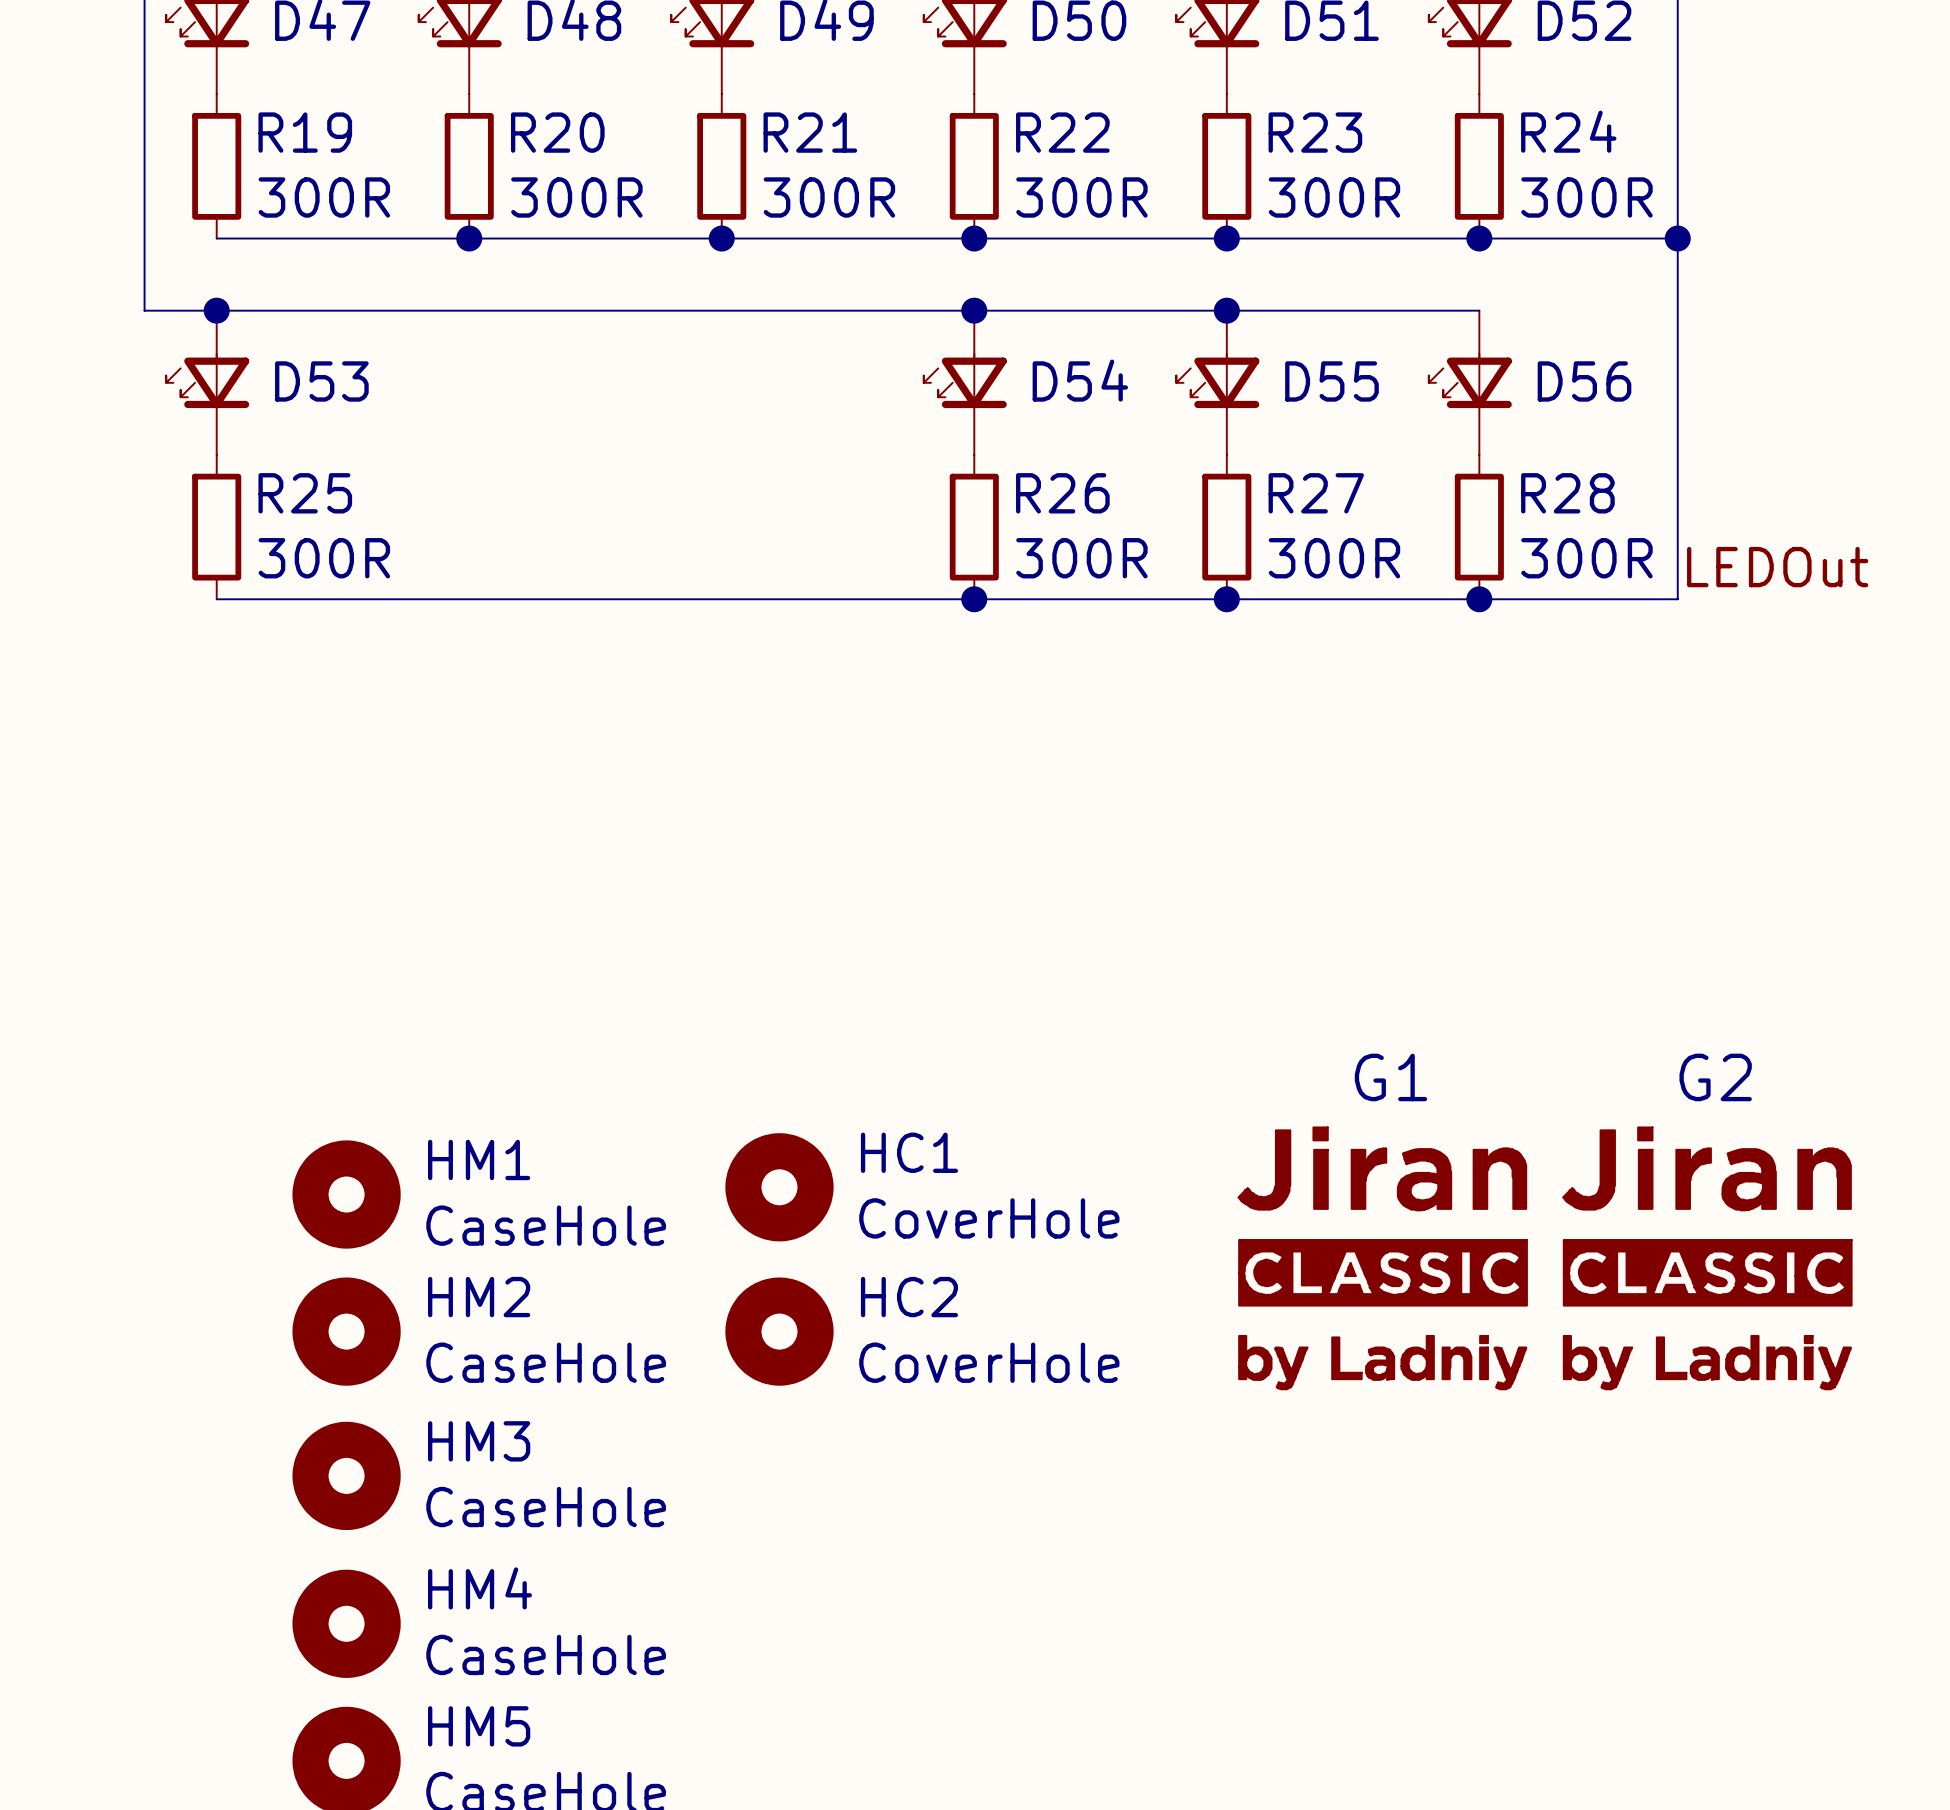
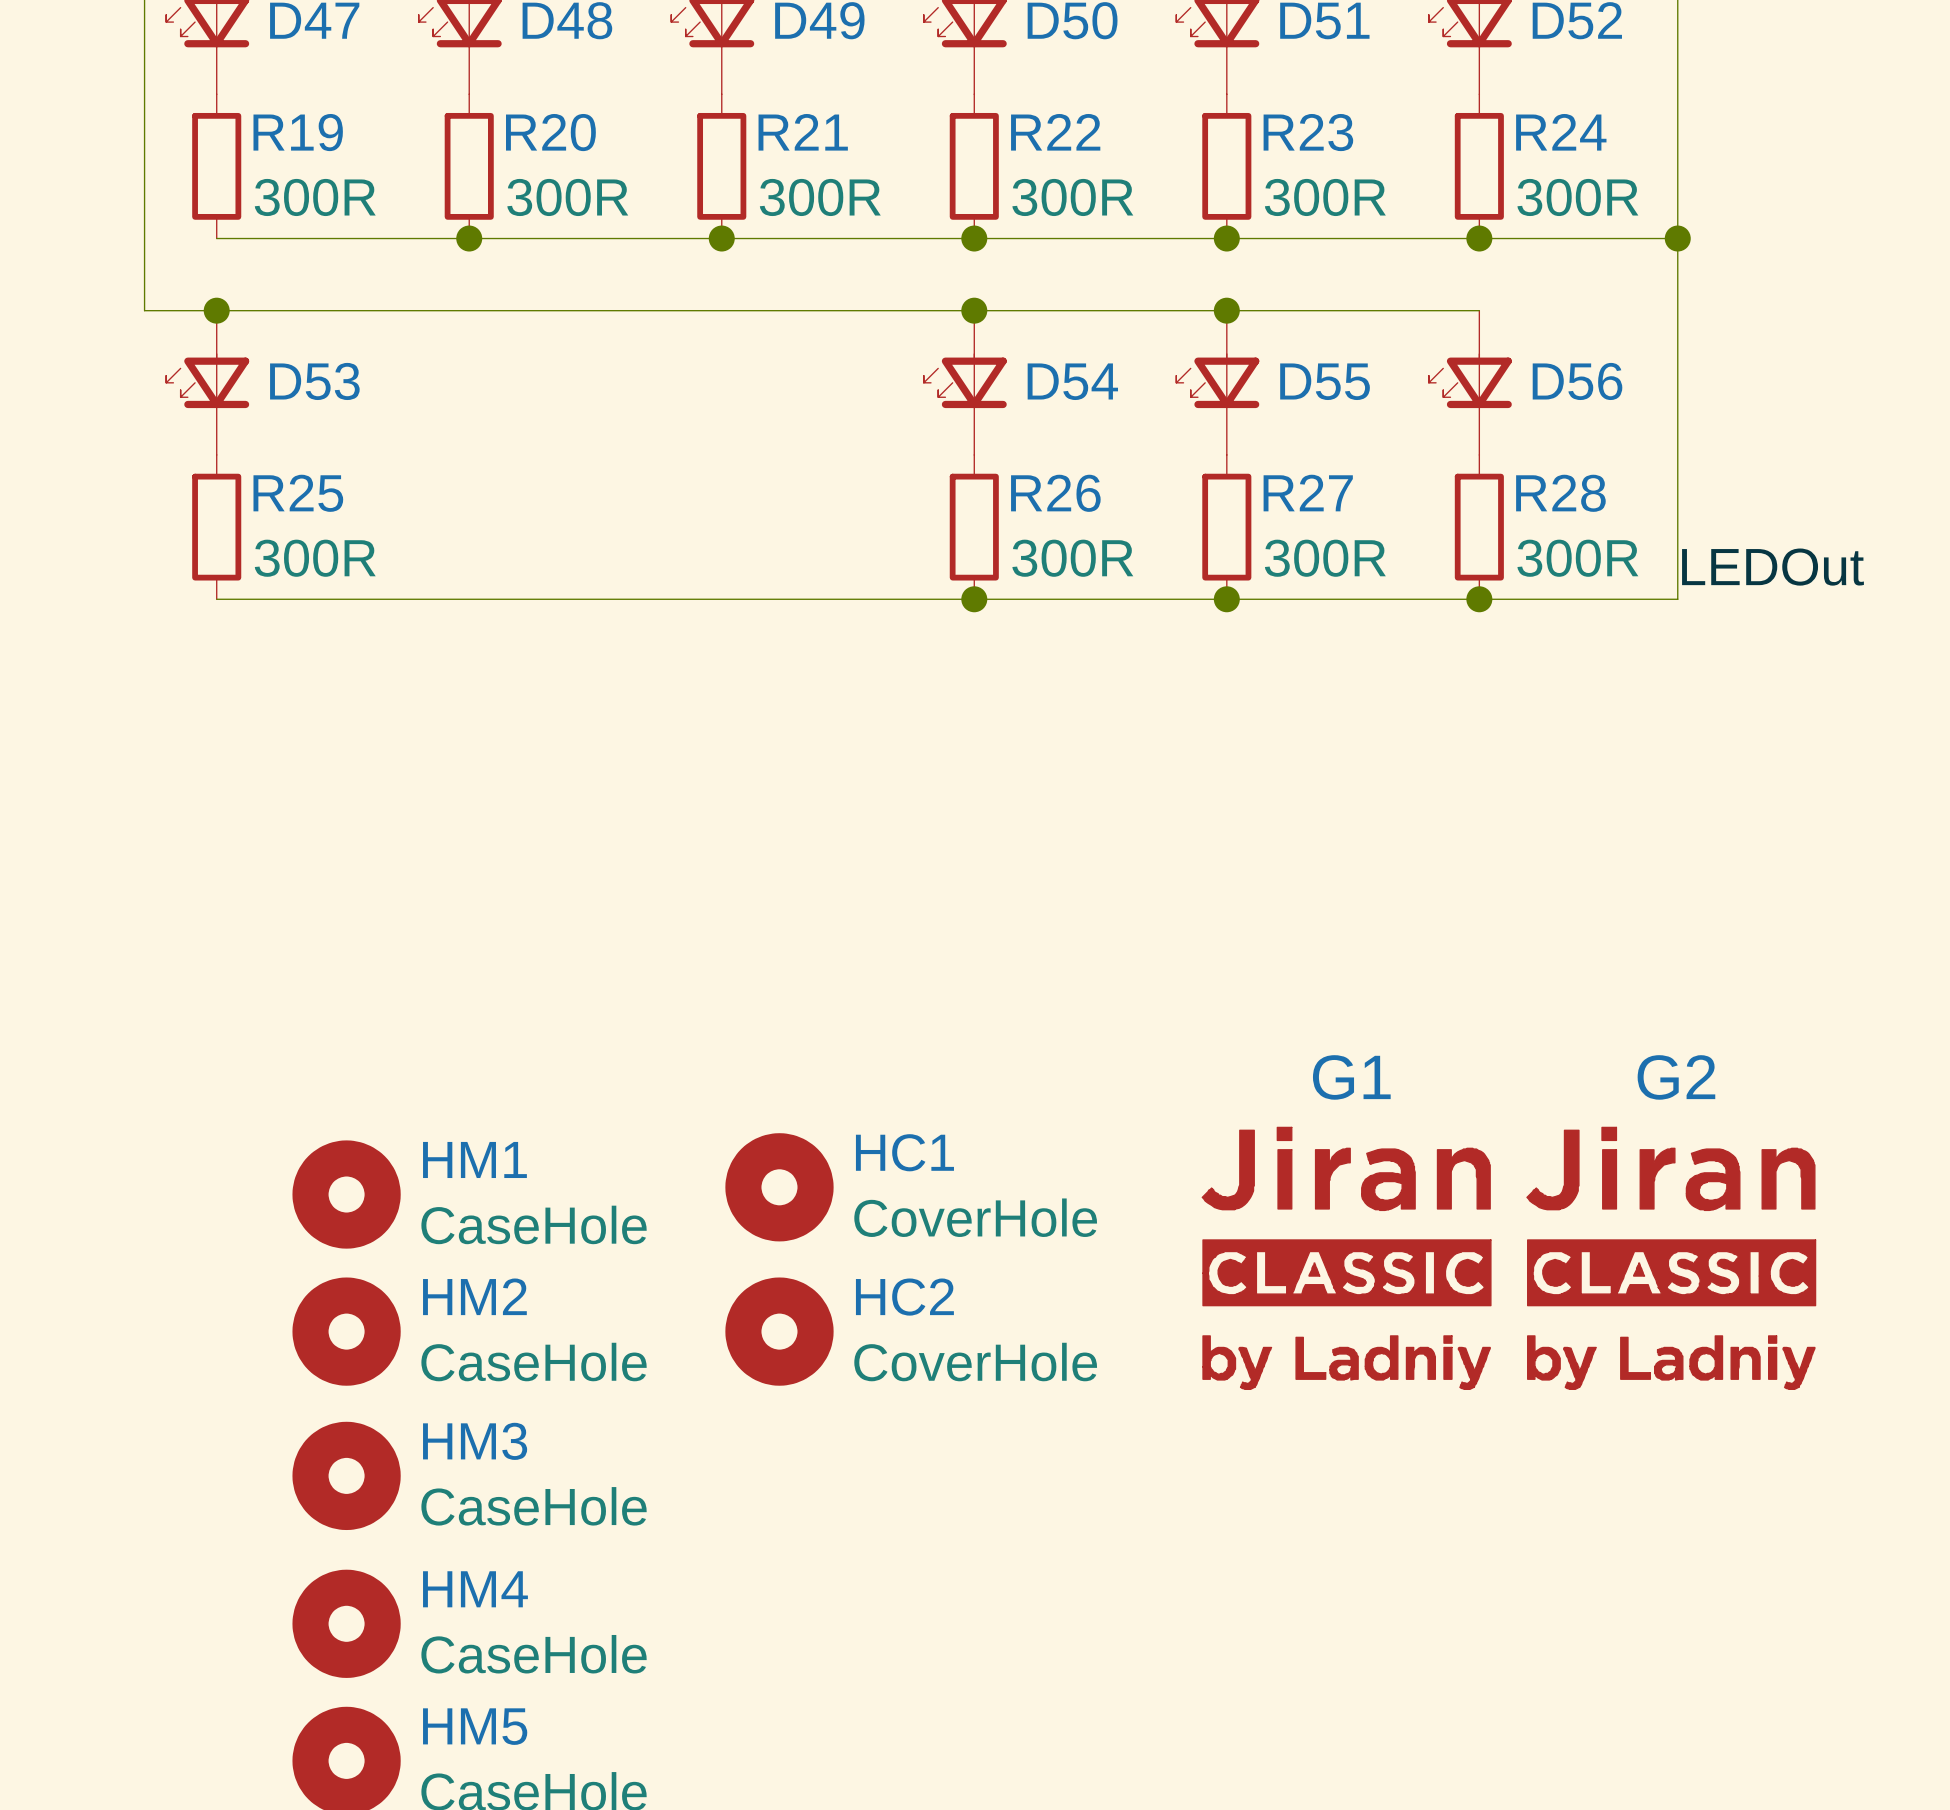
G1 position: (1382, 1258) -> (1346, 1258)
G2 position: (1707, 1258) -> (1671, 1258)

